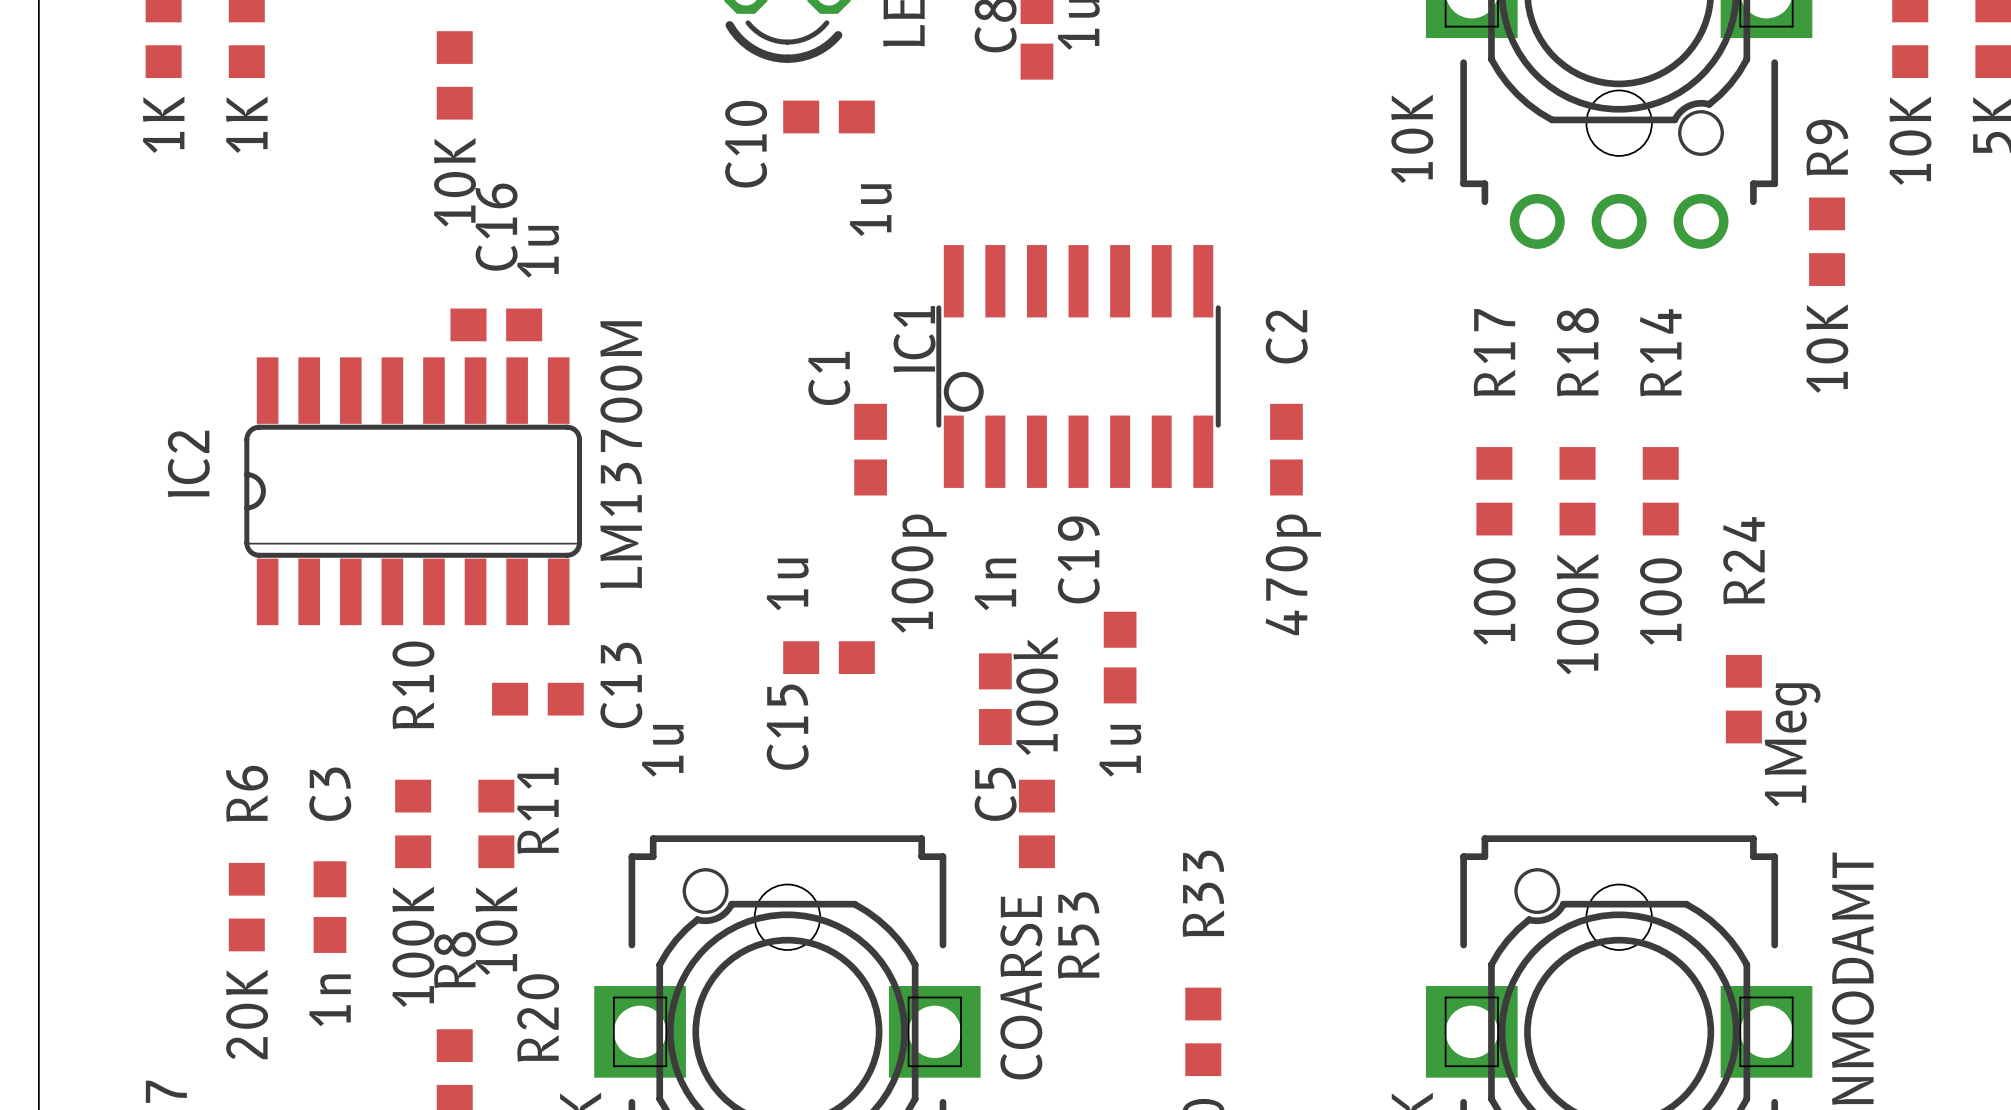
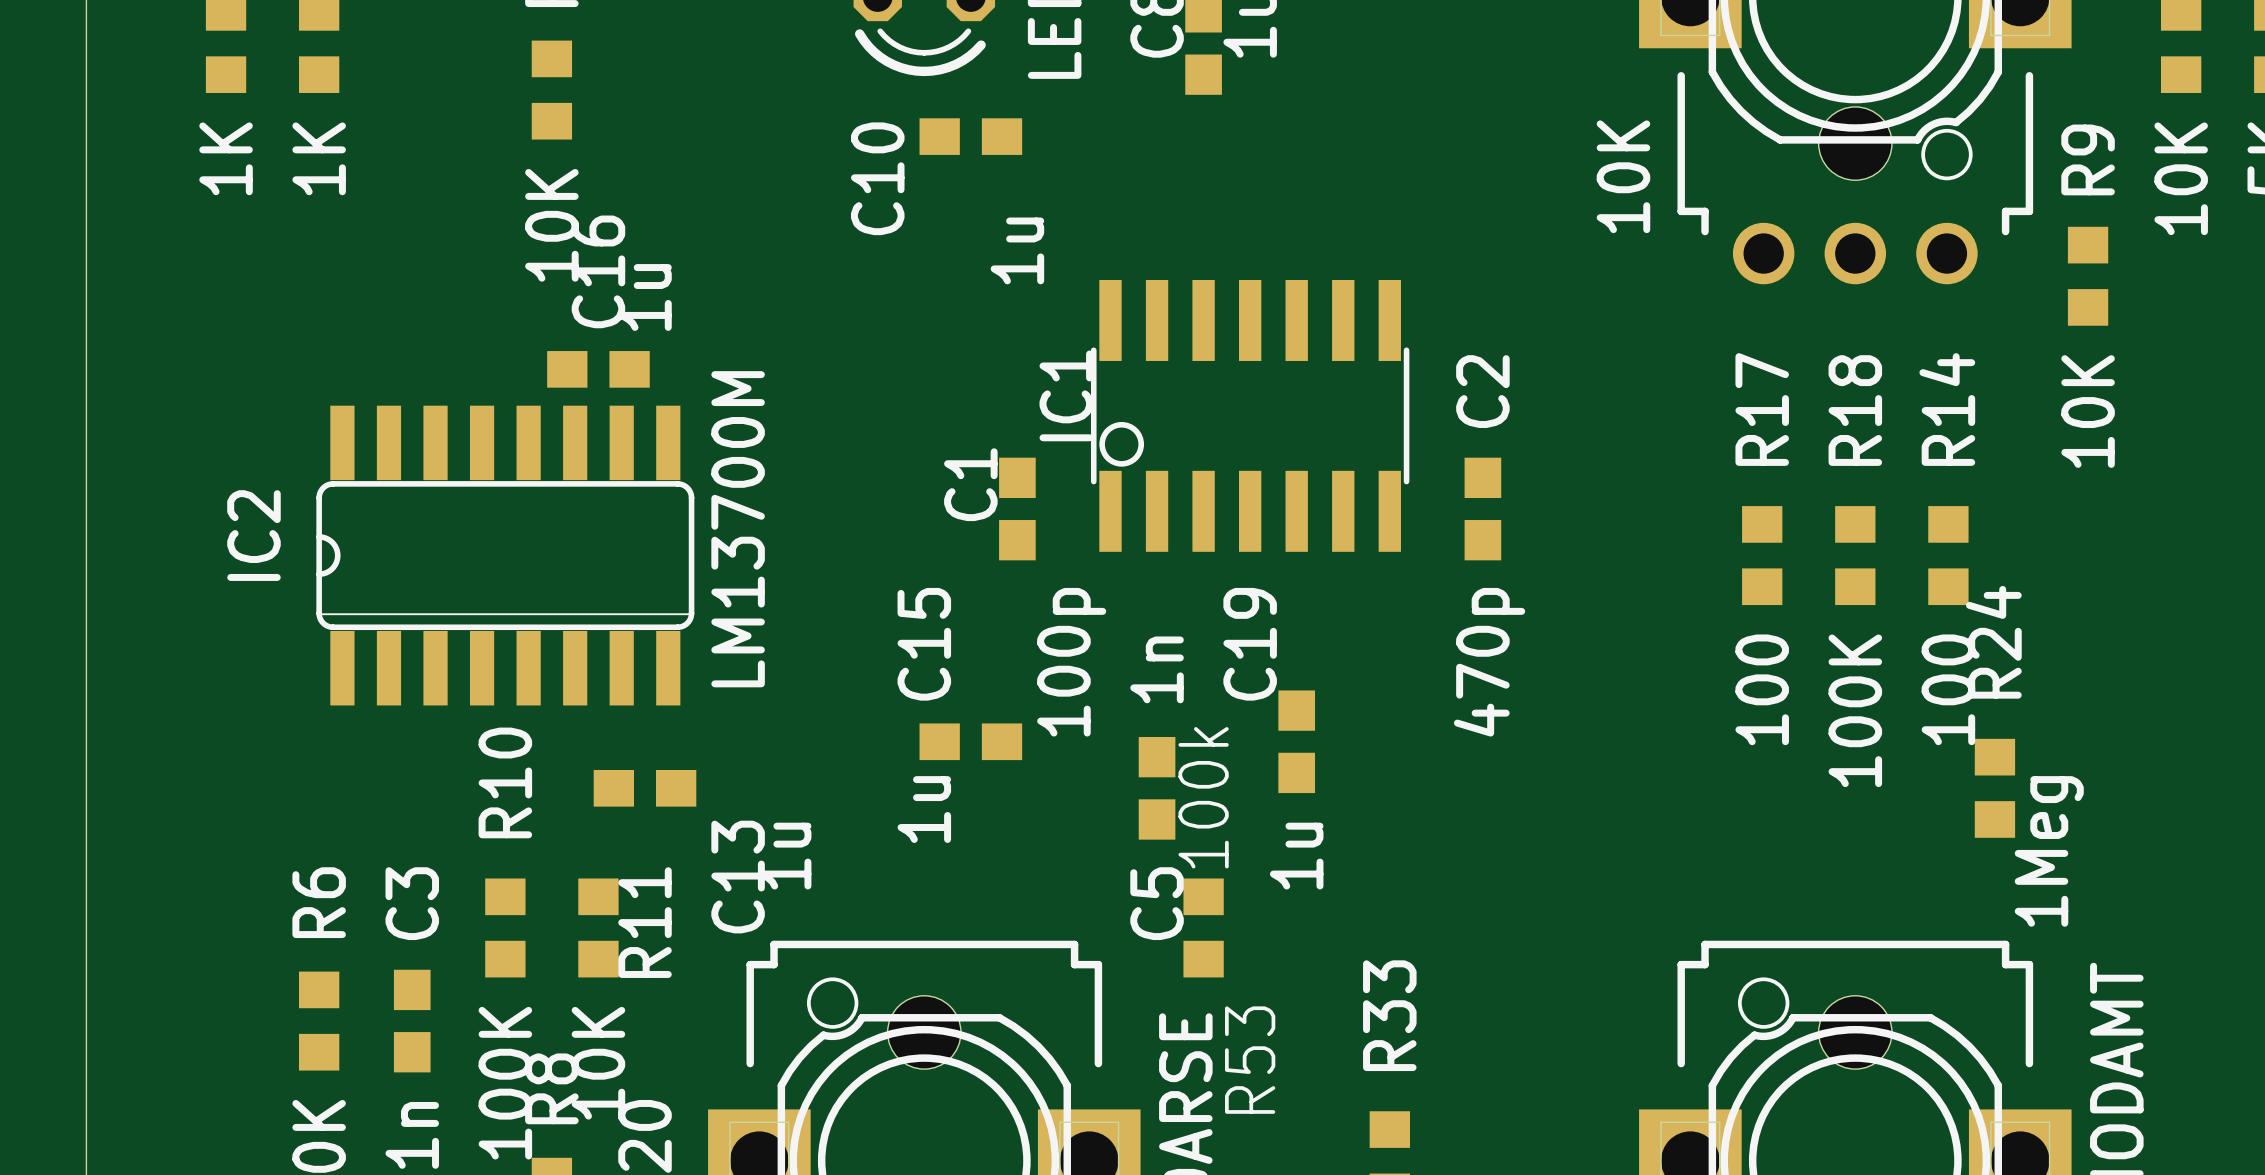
C1 name position: C1 (829, 378) -> C1 (970, 484)
R17 position: (1494, 491) -> (1762, 555)
R18 position: (1577, 491) -> (1855, 555)
R14 position: (1660, 491) -> (1948, 555)
C15 value position: 1u (787, 584) -> 1u (924, 809)
C13 name position: C13 (621, 685) -> C13 (738, 877)
C15 name position: C15 (787, 727) -> C15 (924, 644)

